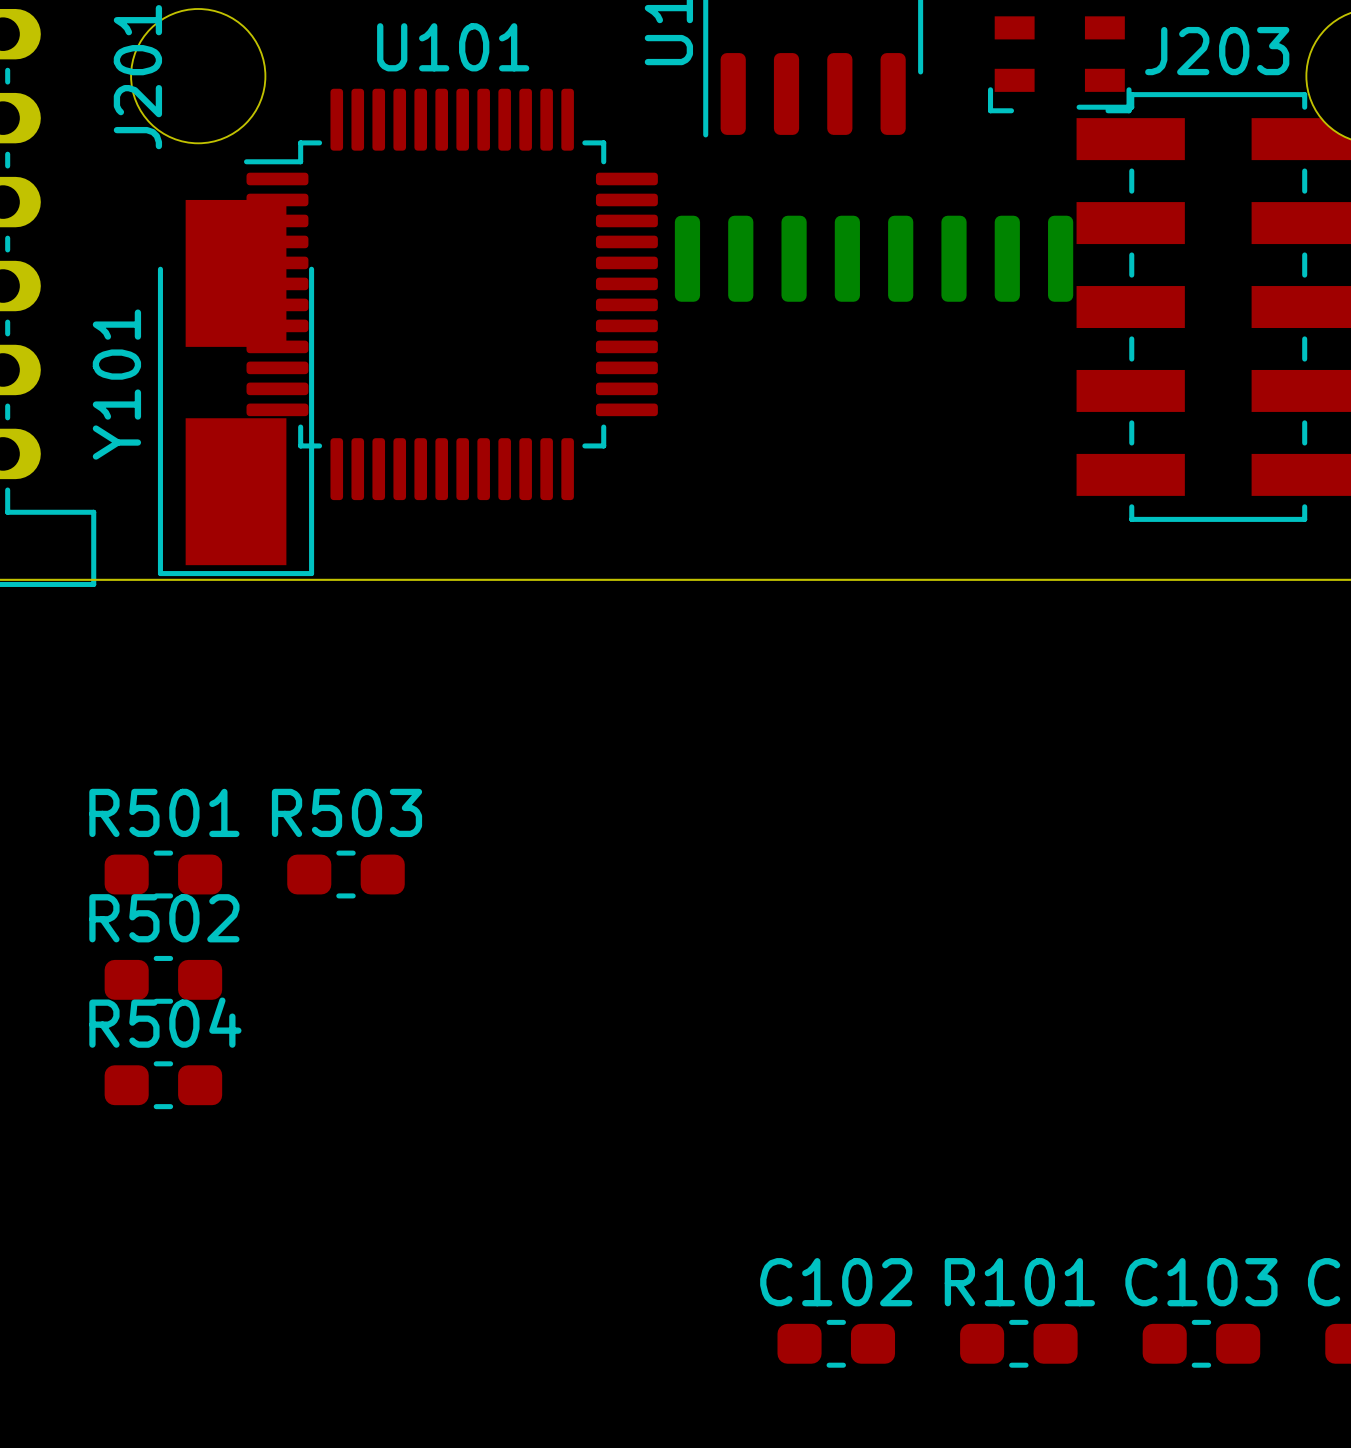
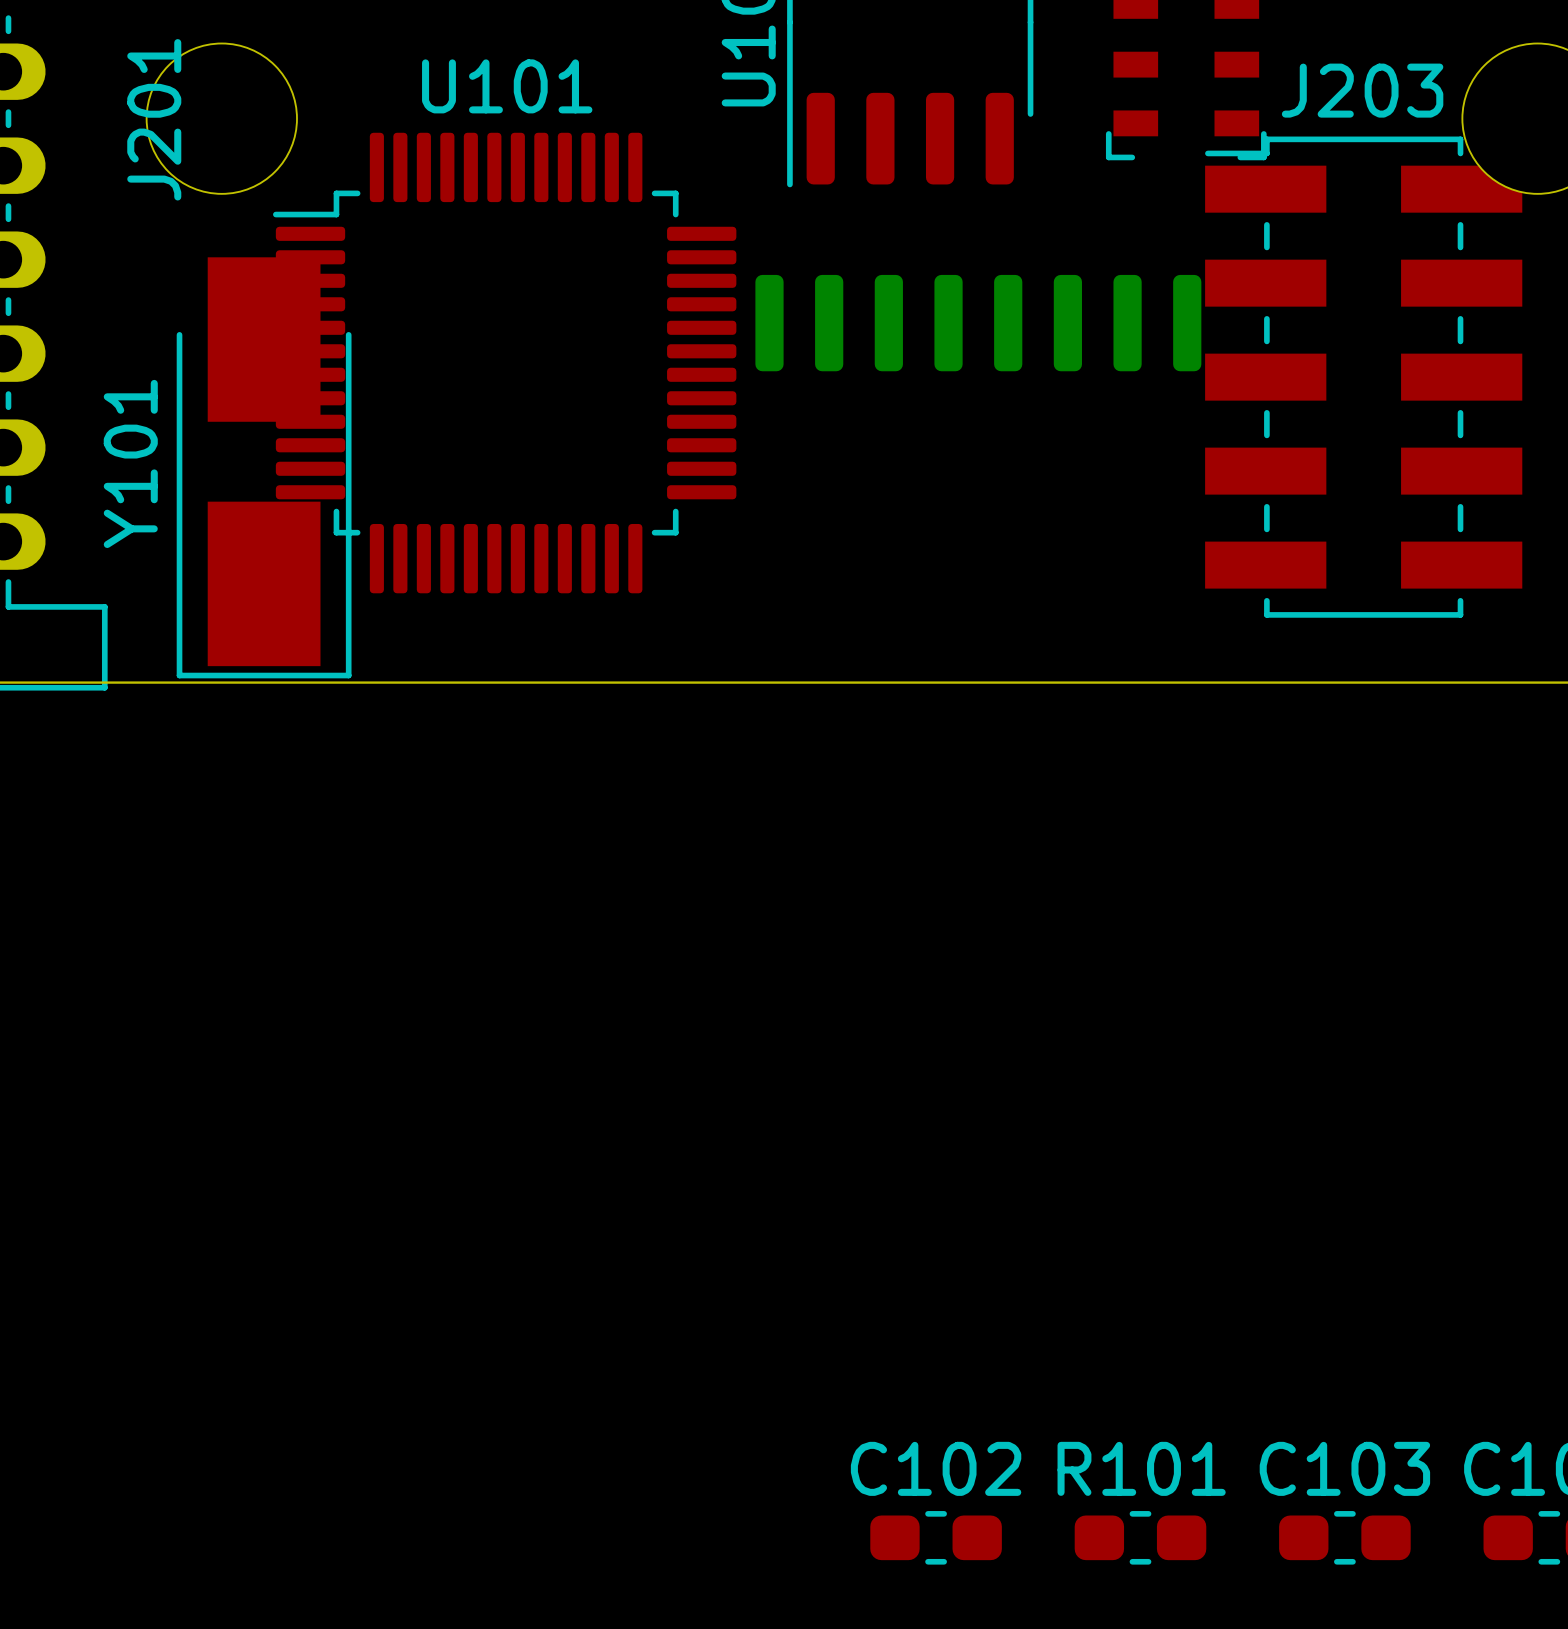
R501: (163, 874) -> none
R503: (345, 874) -> none
R502: (163, 979) -> none
R504: (163, 1085) -> none

